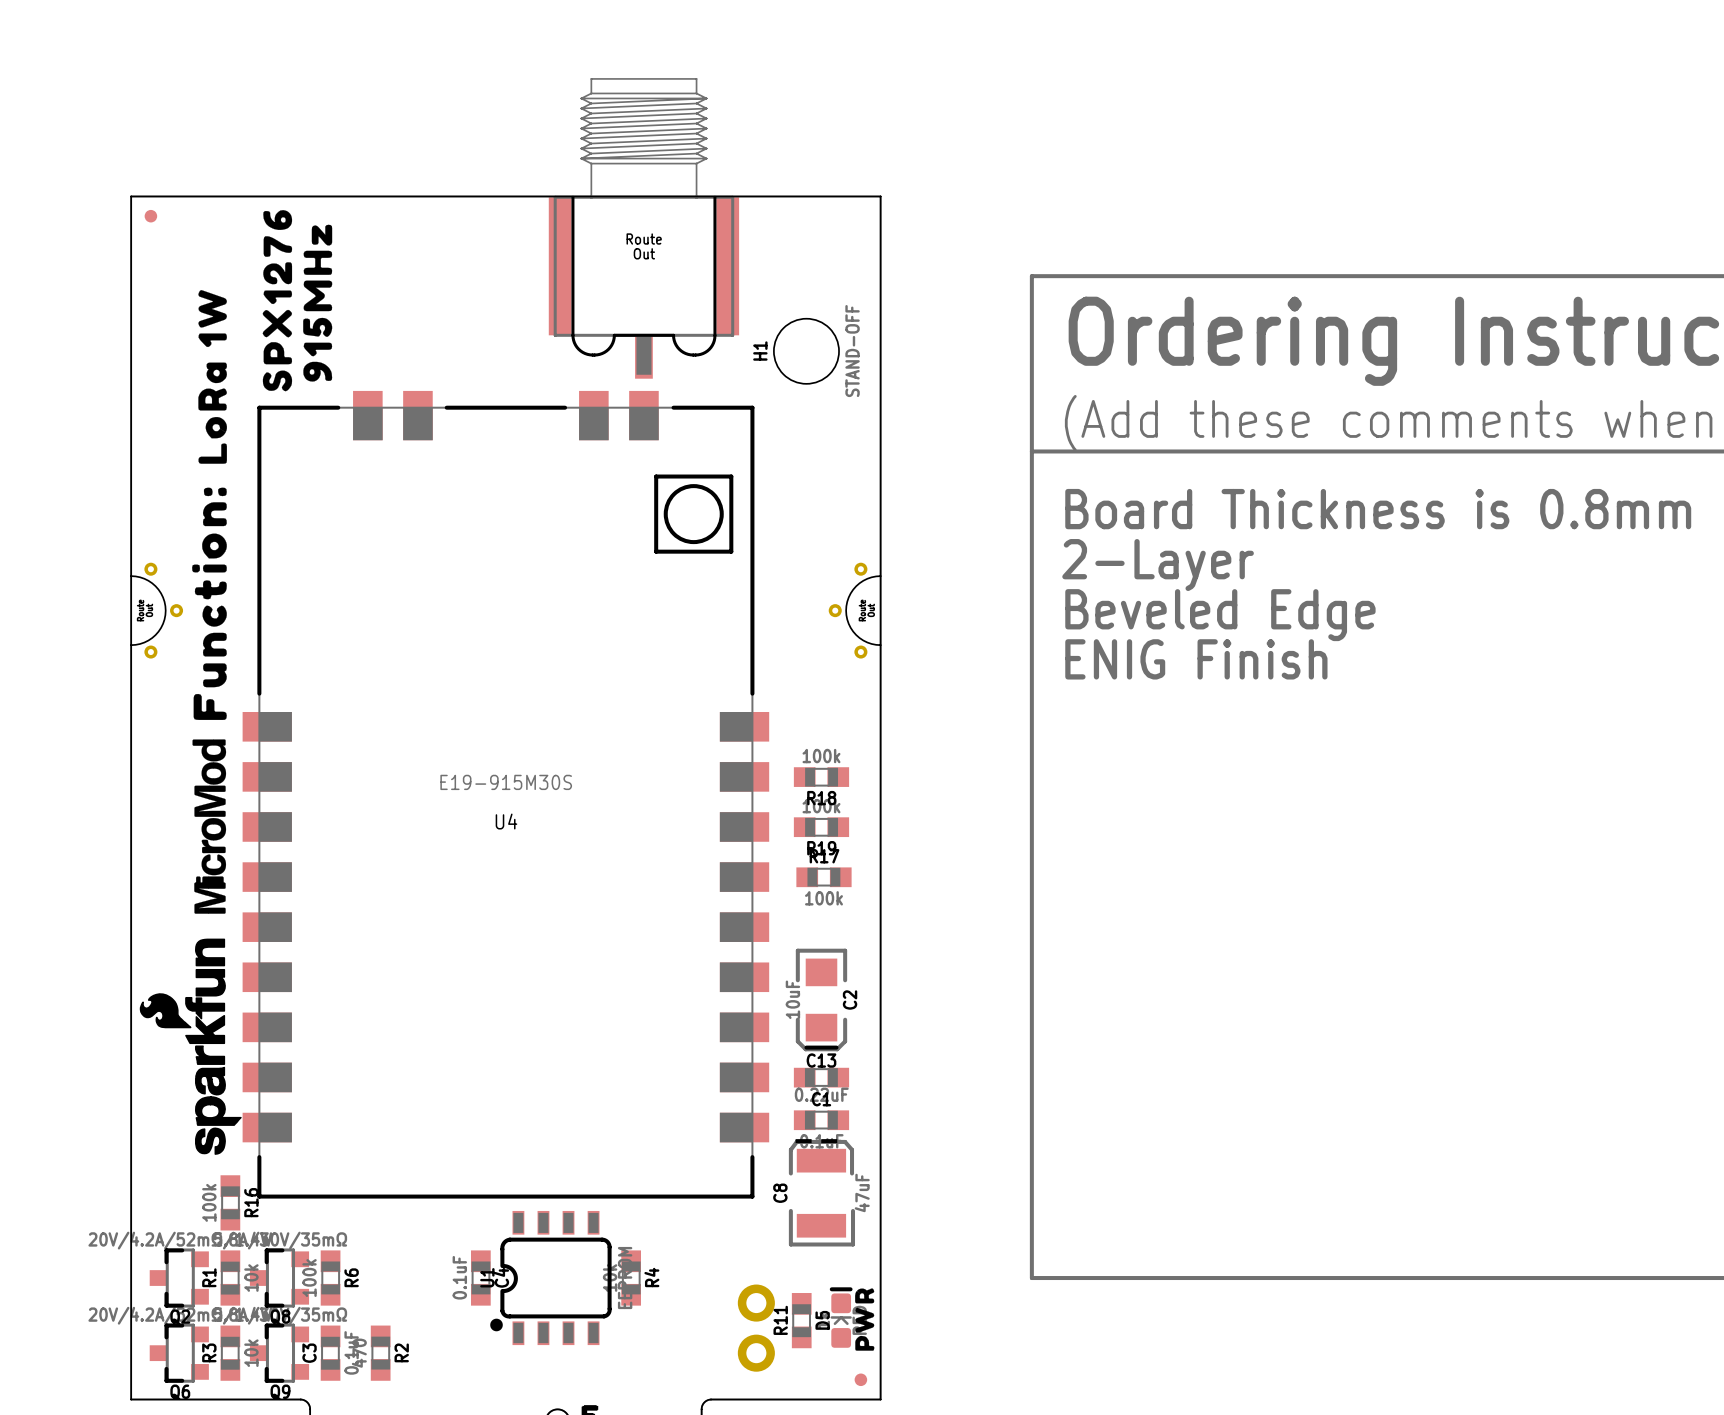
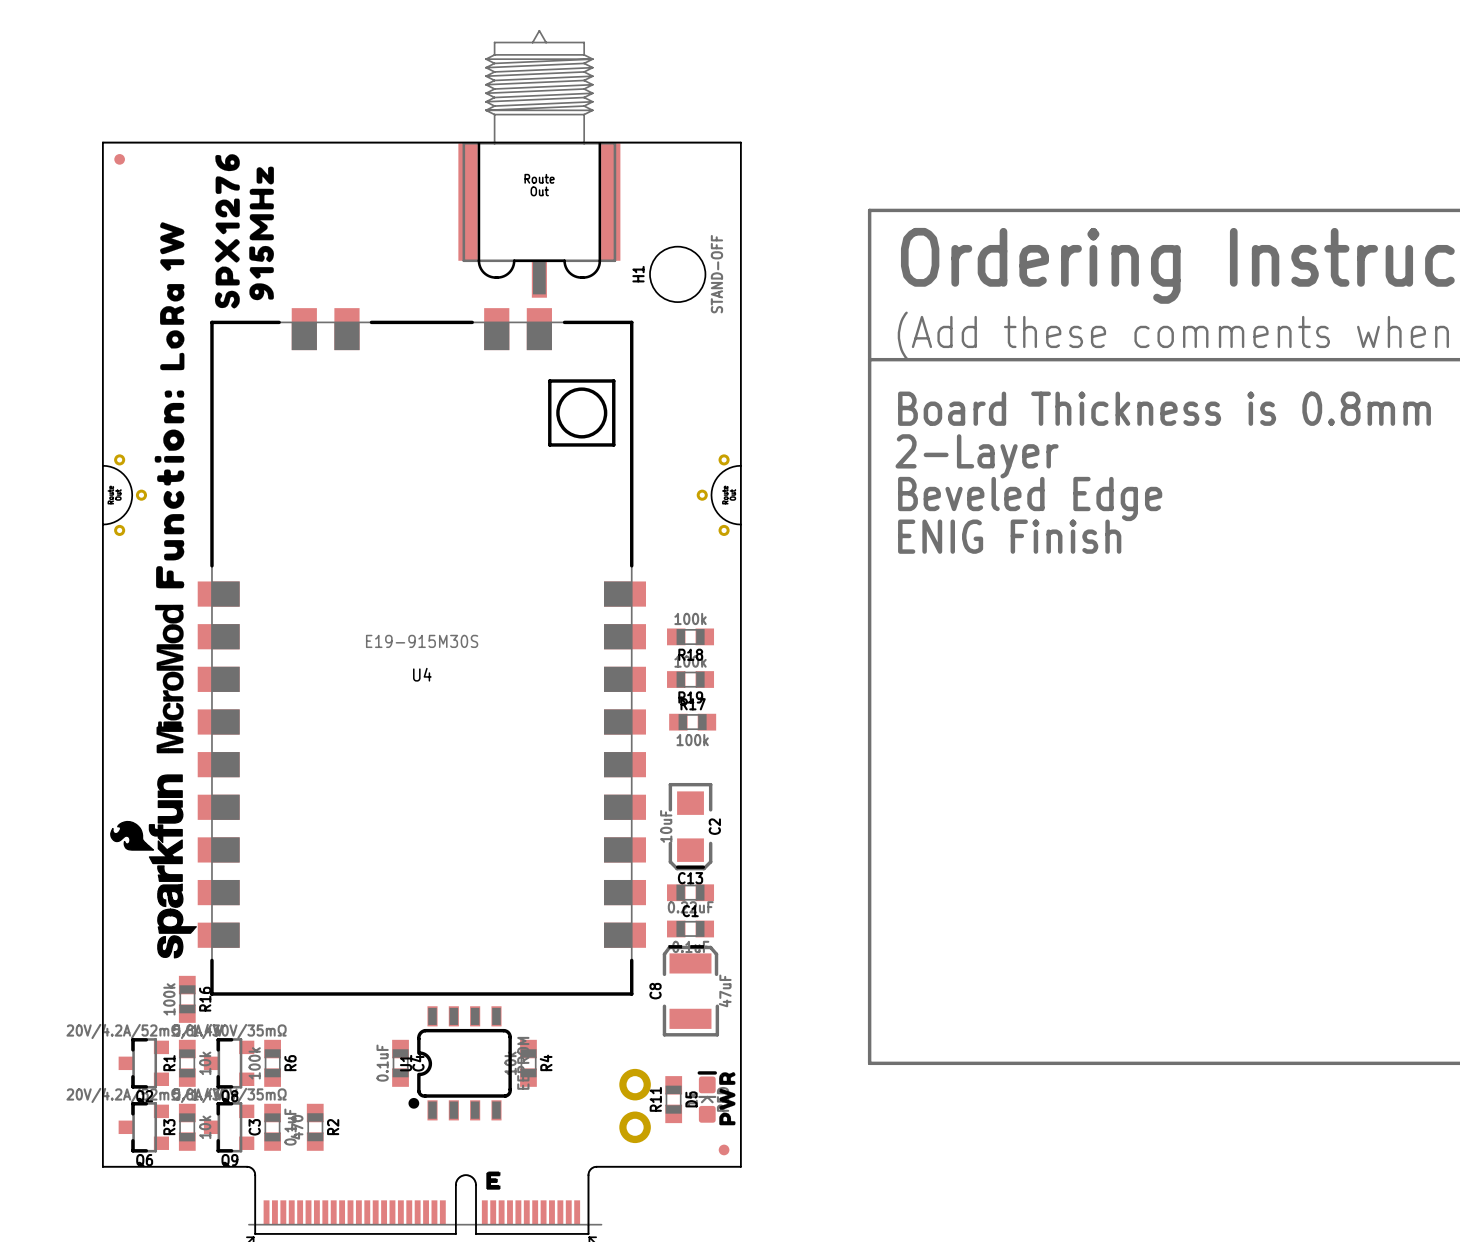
part footprint: [548, 78, 740, 379] -> [458, 30, 621, 298]

